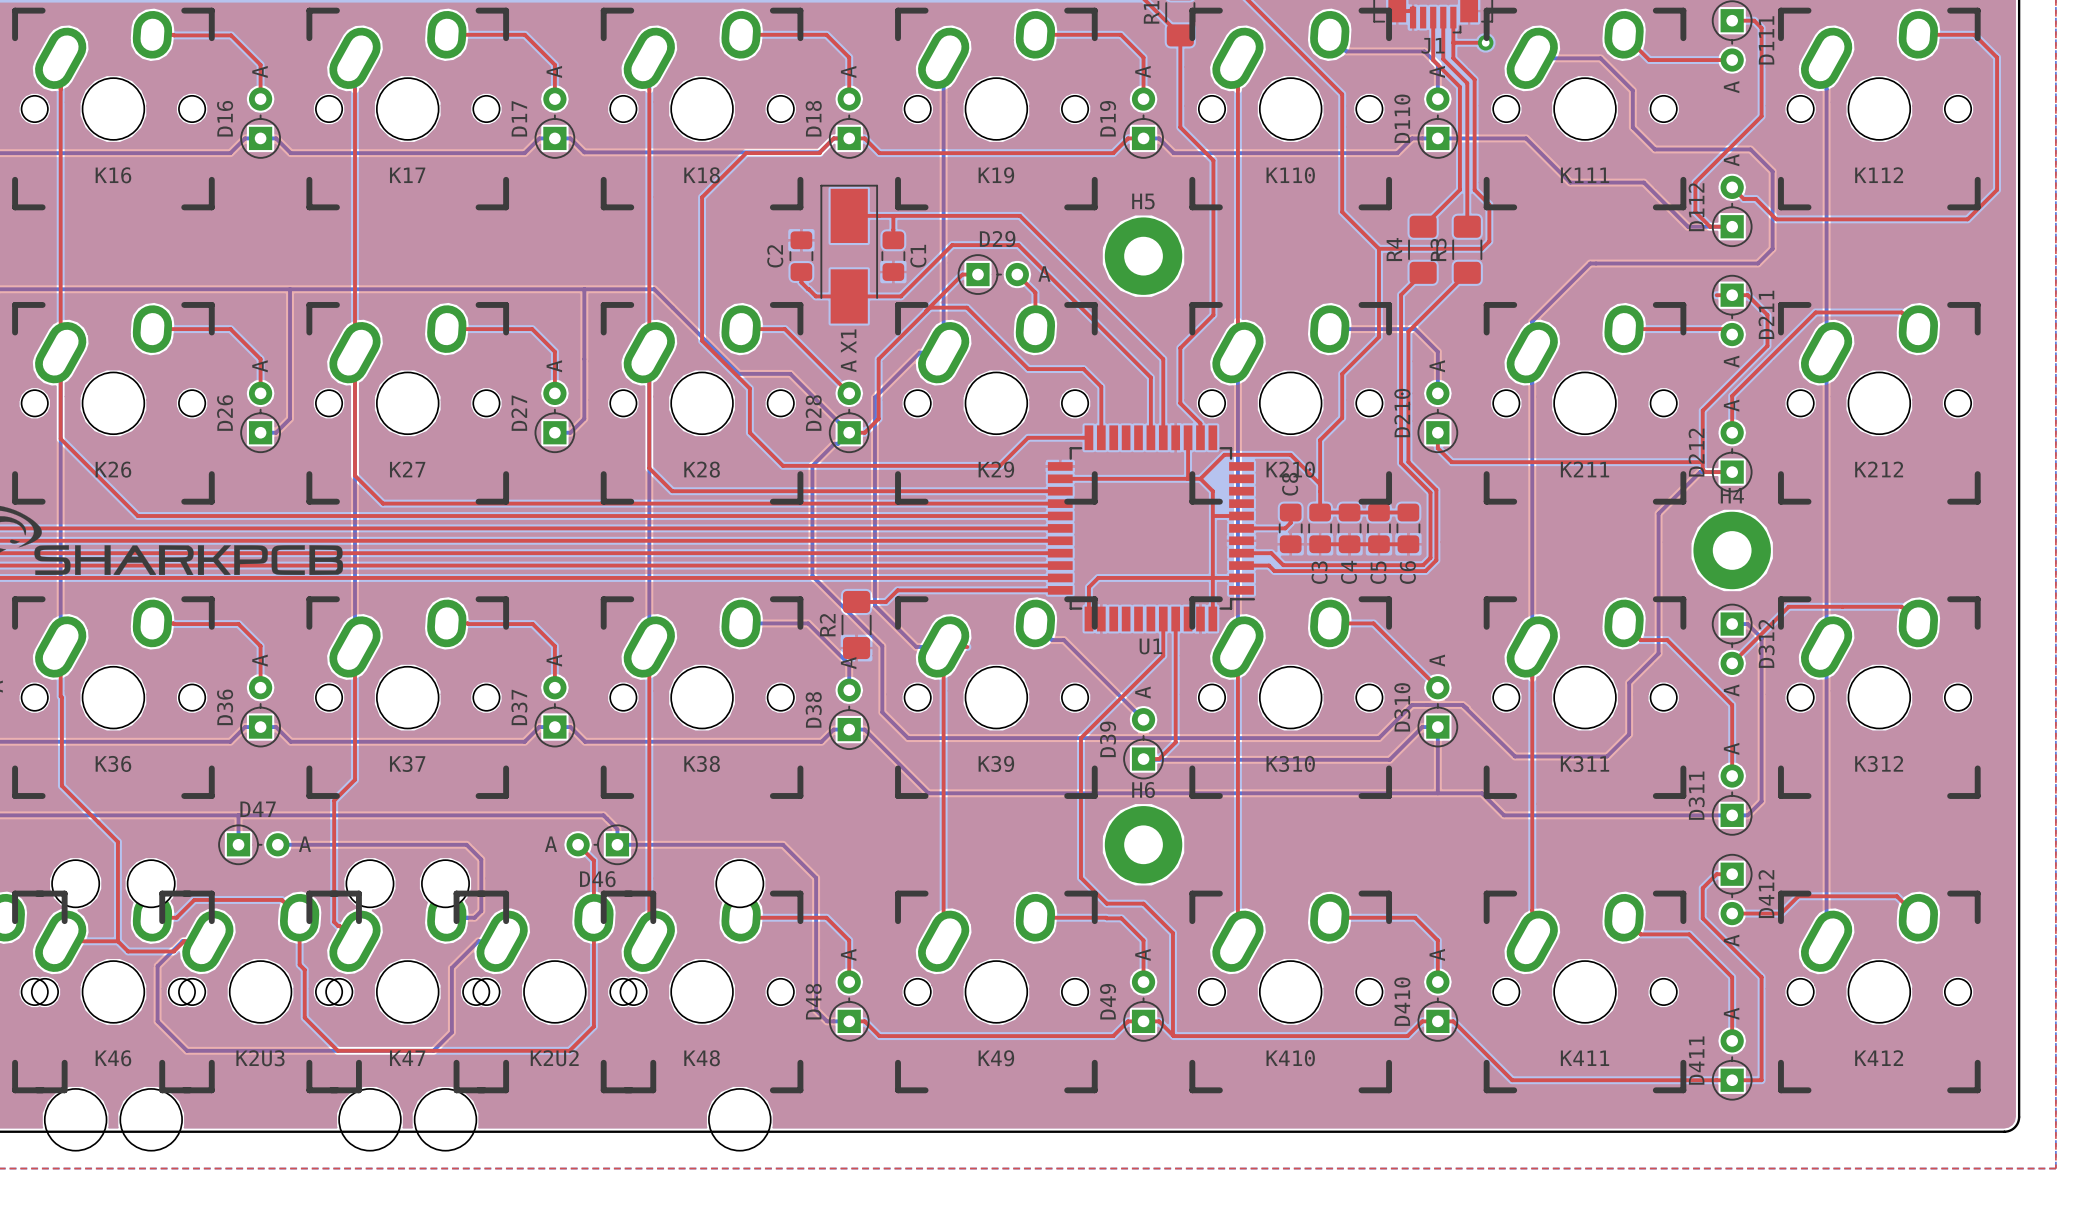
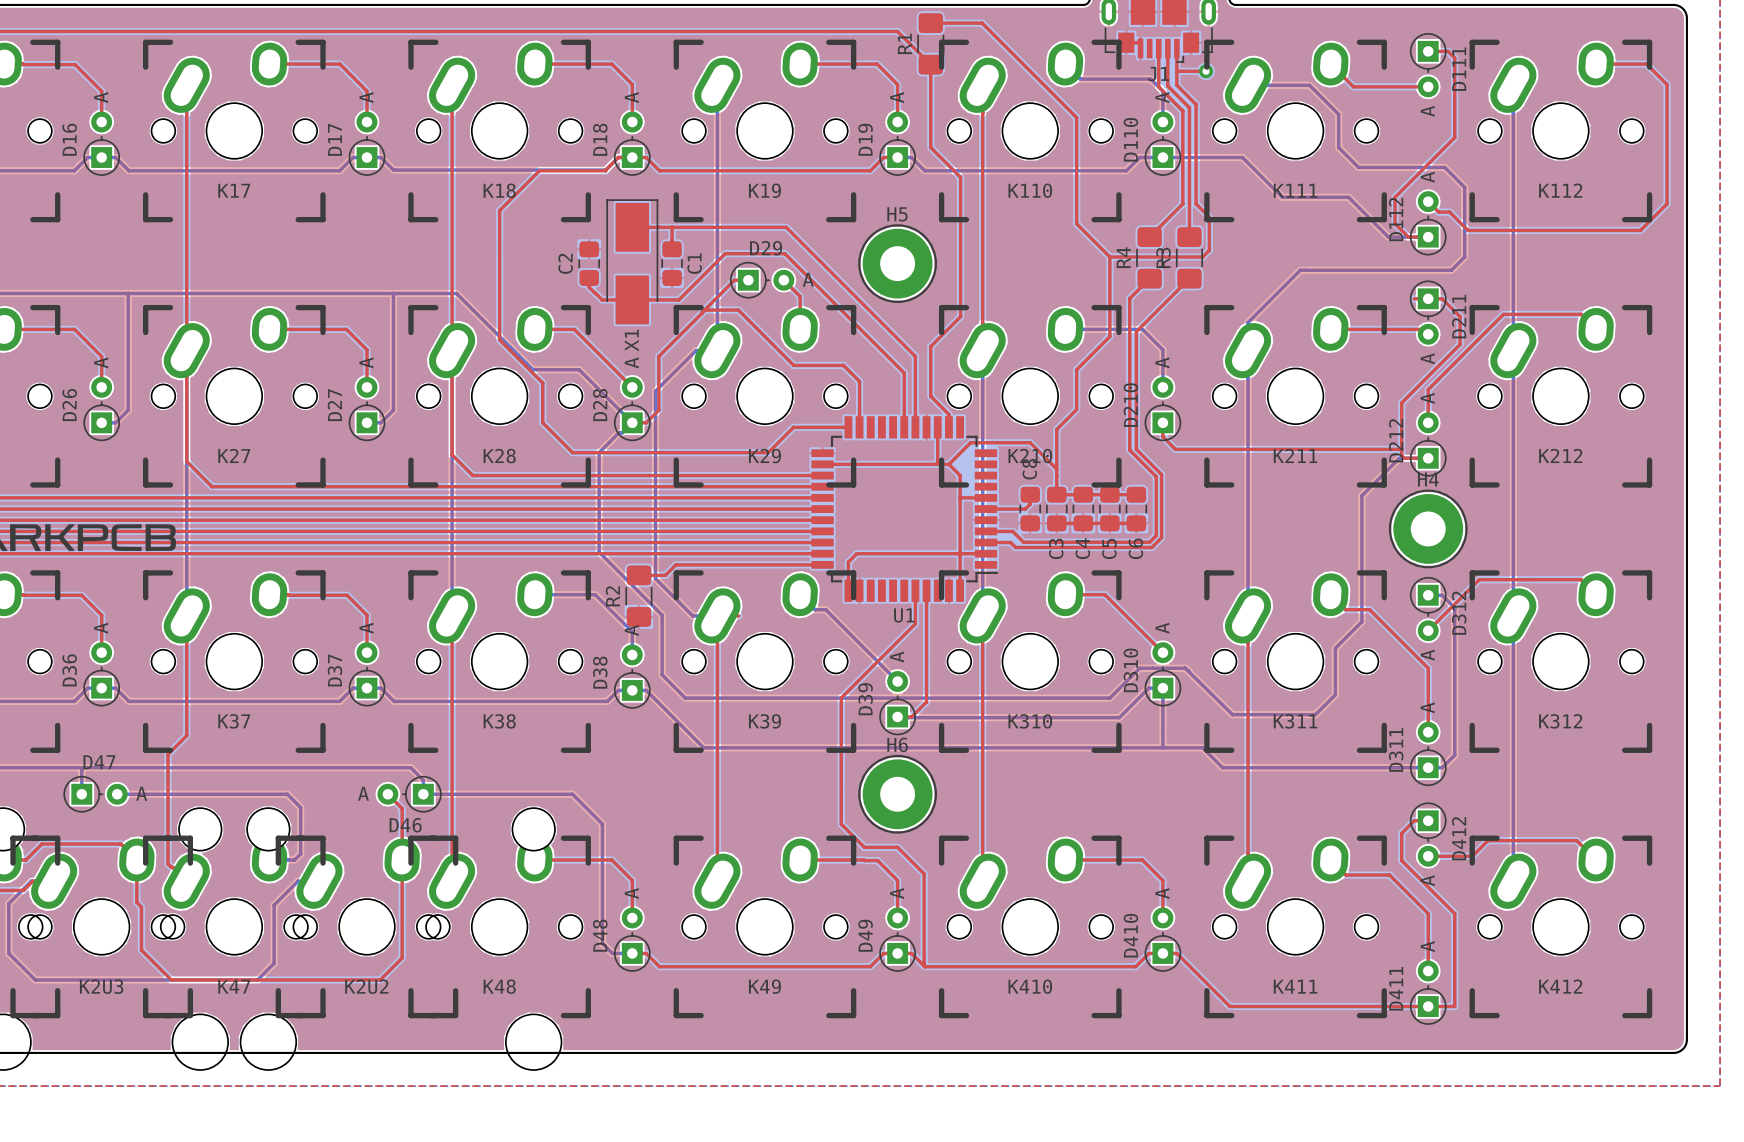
drawing: none -> [858, 224, 937, 304]
drawing: none -> [1388, 489, 1468, 569]
drawing: none -> [858, 754, 937, 834]

